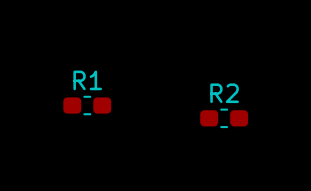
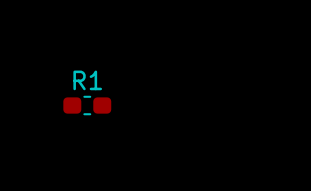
R2: (224, 118) -> none

